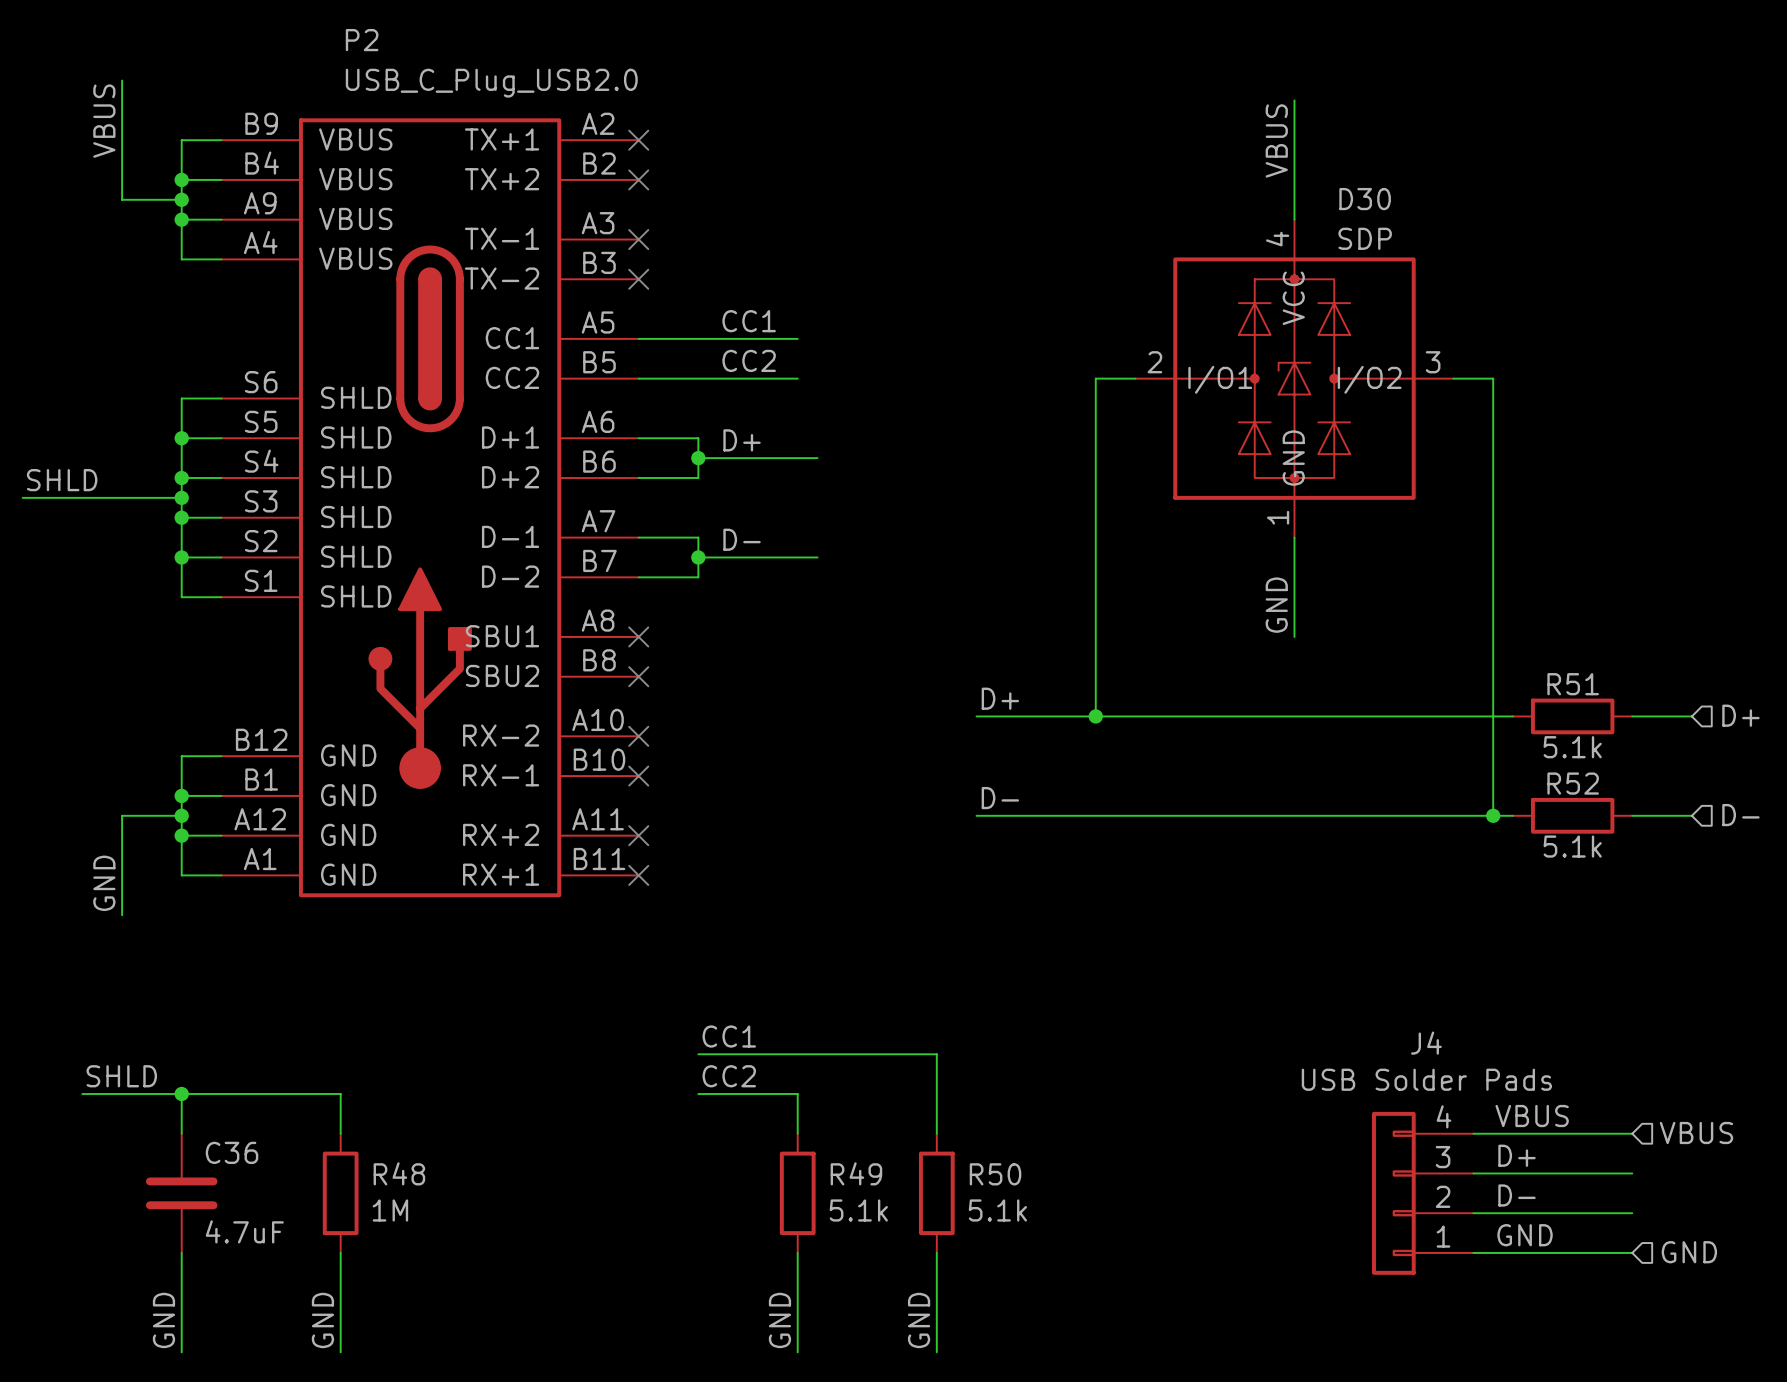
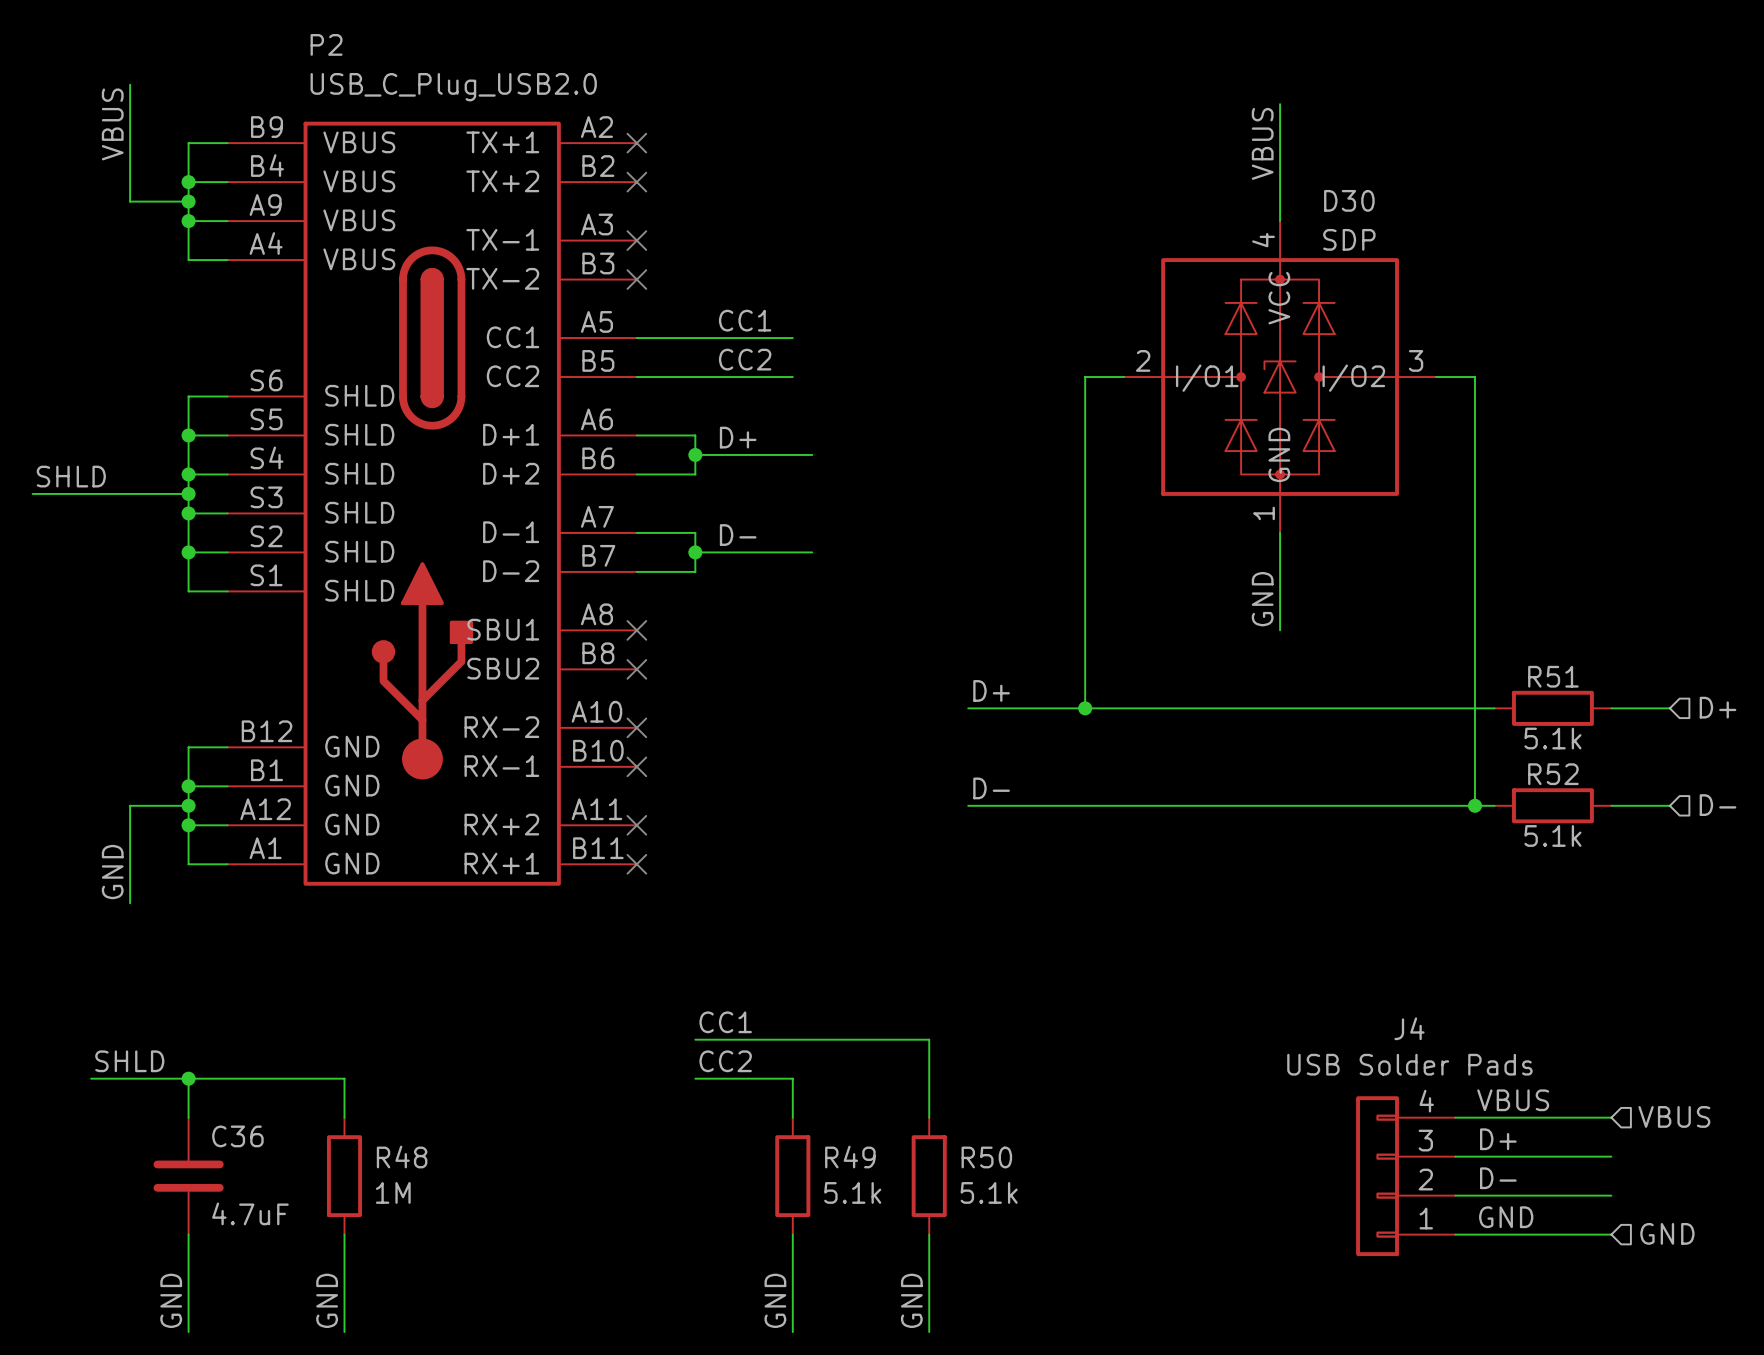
P2 name position: P2 (362, 40) -> P2 (326, 44)
P2 value position: USB_C_Plug_USB2.0 (491, 83) -> USB_C_Plug_USB2.0 (453, 87)

